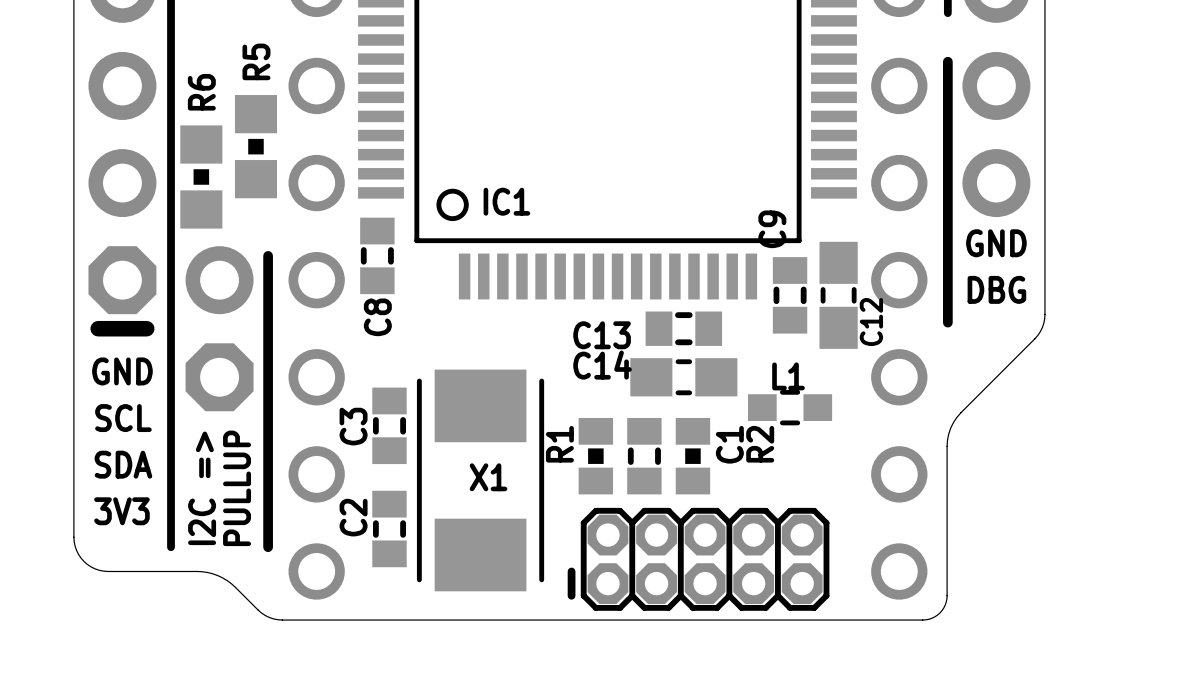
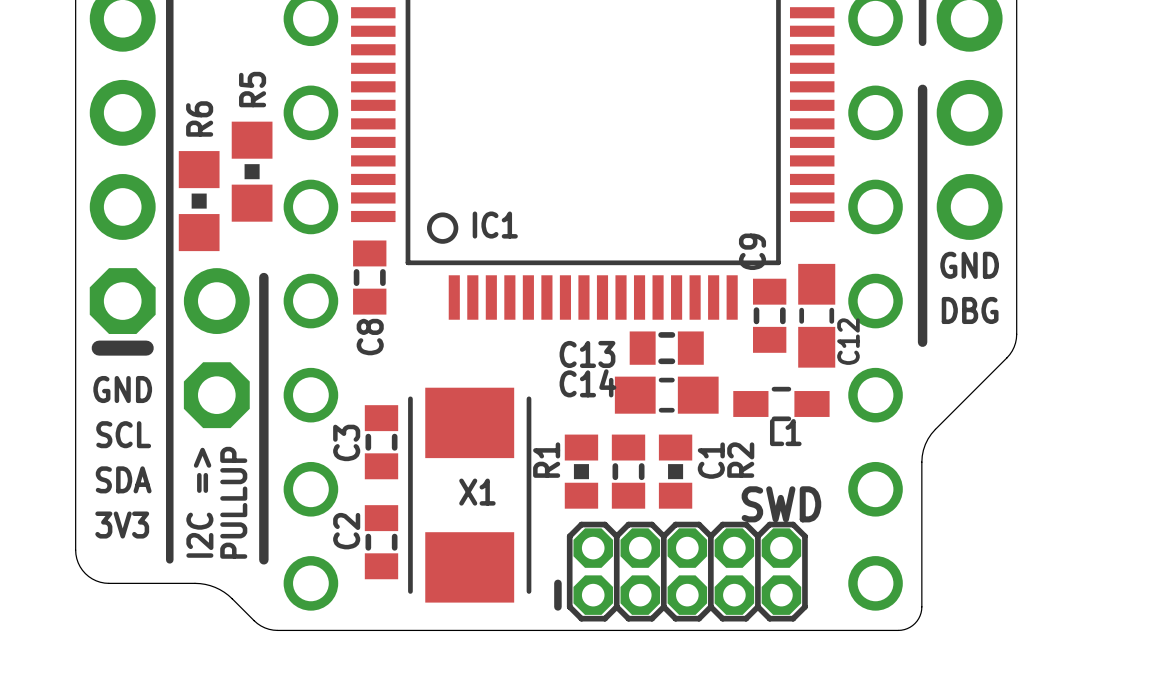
L1 name position: L1 (788, 376) -> L1 (785, 432)
L1 footprint: [748, 389, 833, 426] -> [733, 386, 830, 422]
text: none -> SWD (781, 504)

